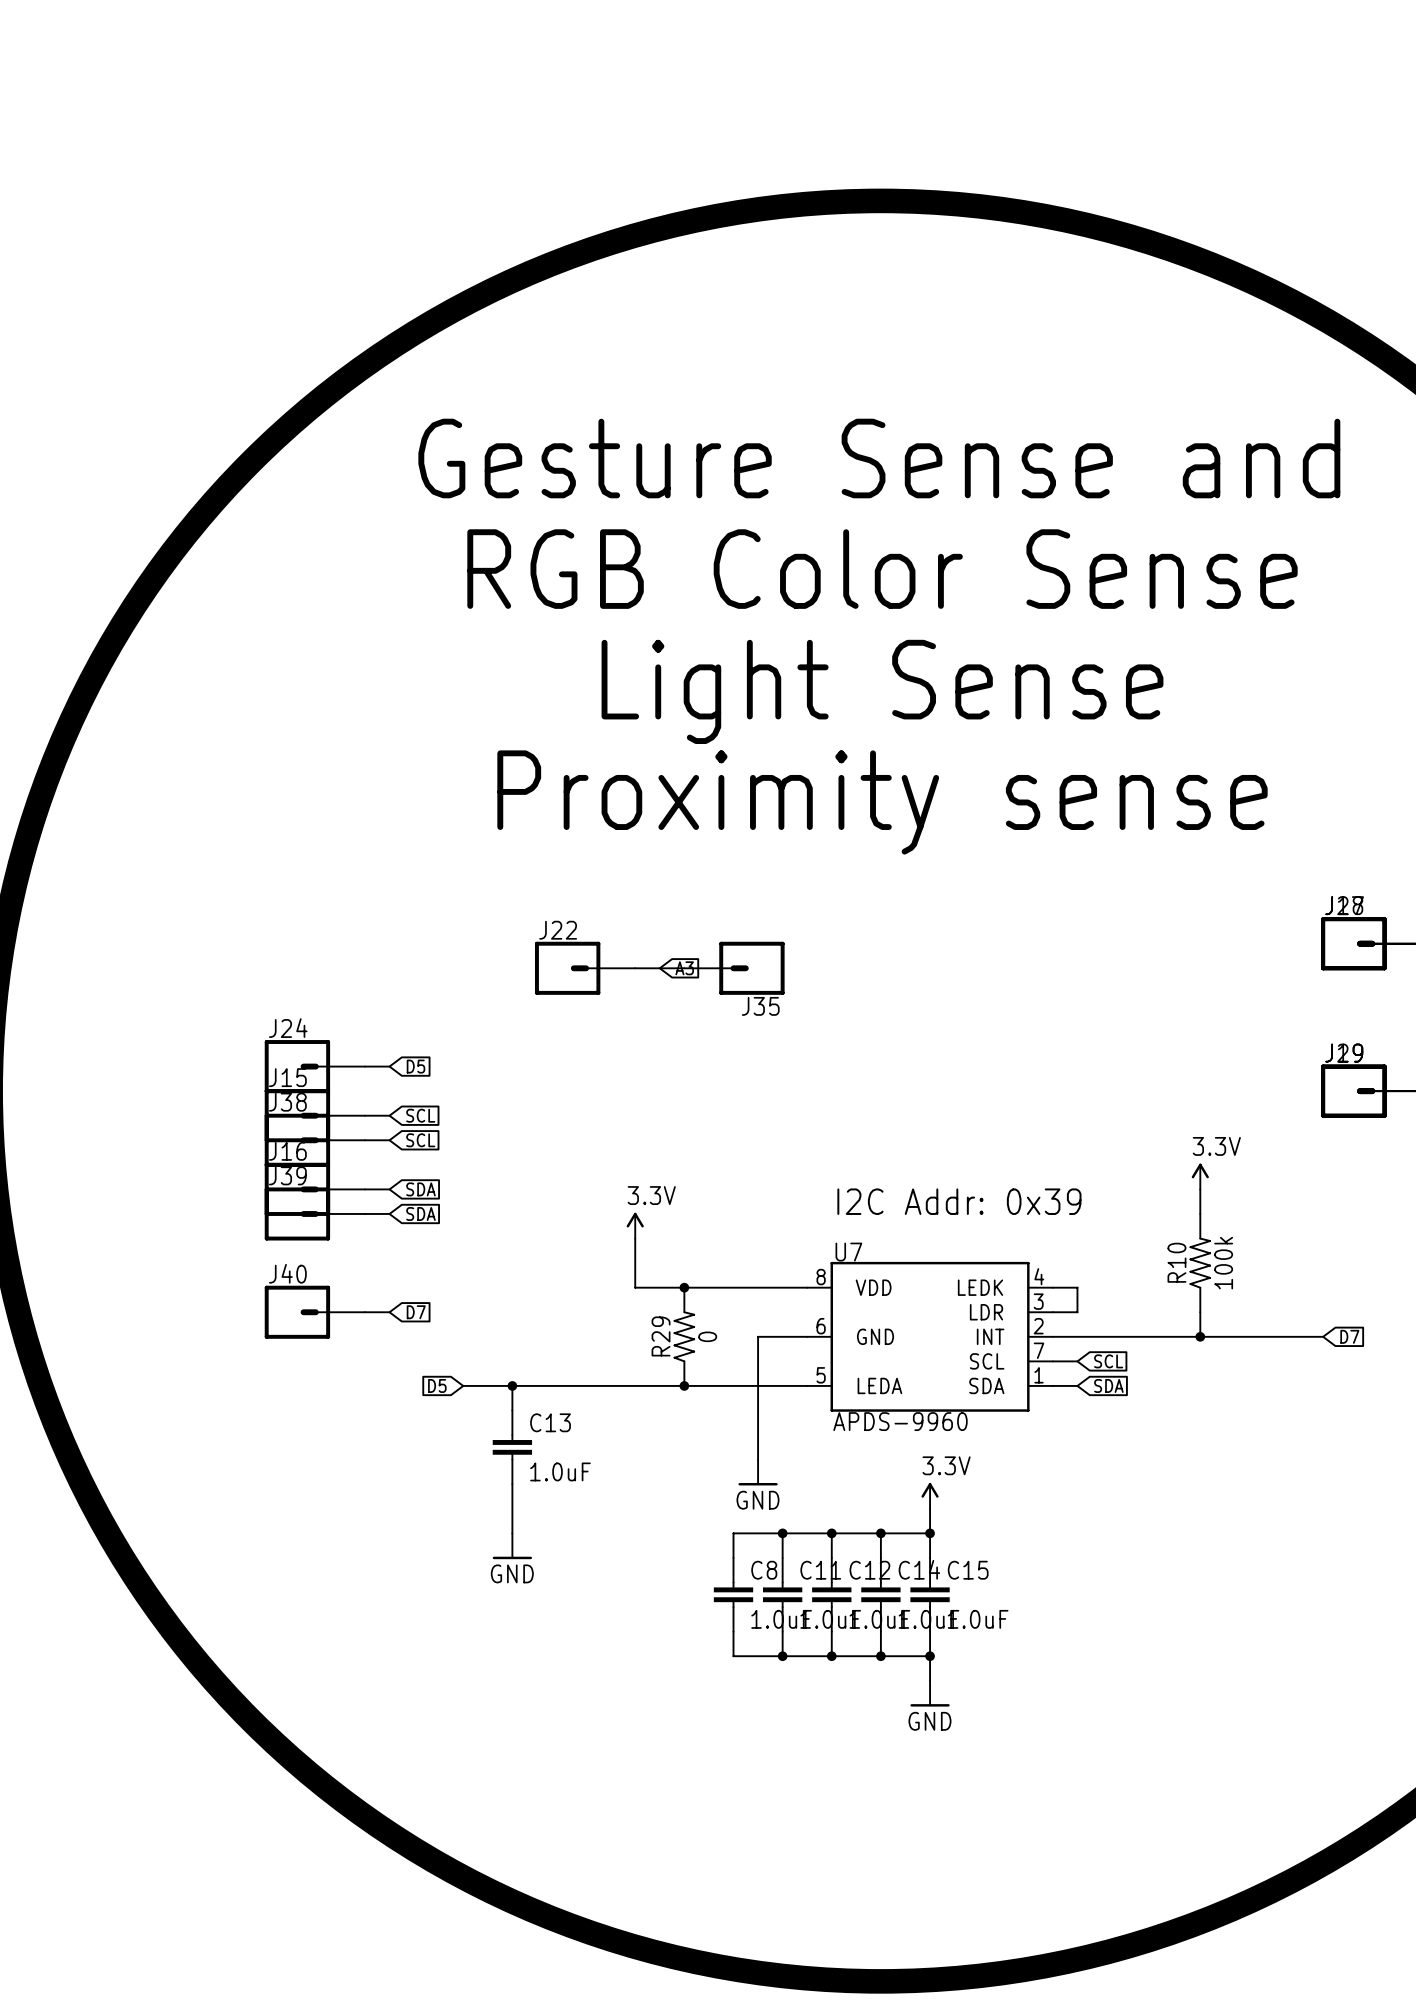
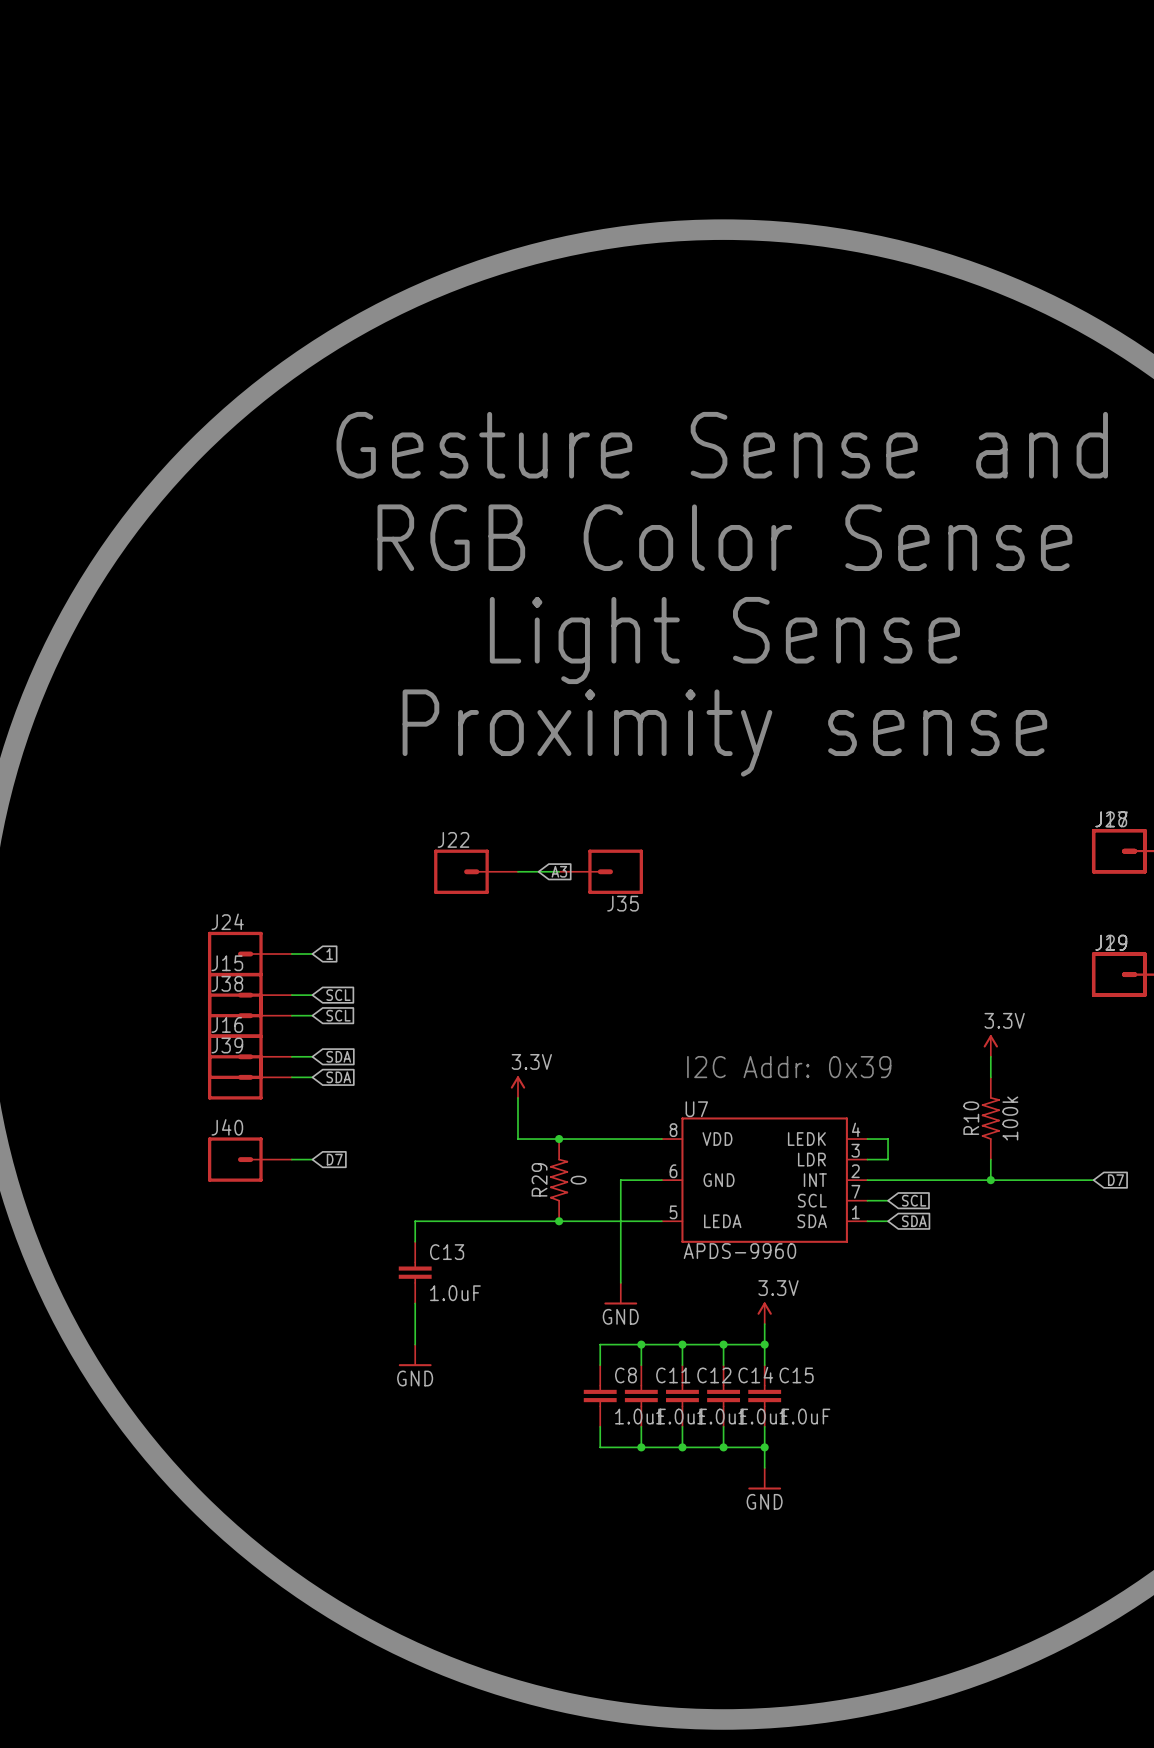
global label: D5 (415, 1066) -> 1 (329, 954)
global label: D5 (437, 1385) -> none
wire: (463, 1385) (512, 1385) -> none
junction: (512, 1385) -> none

